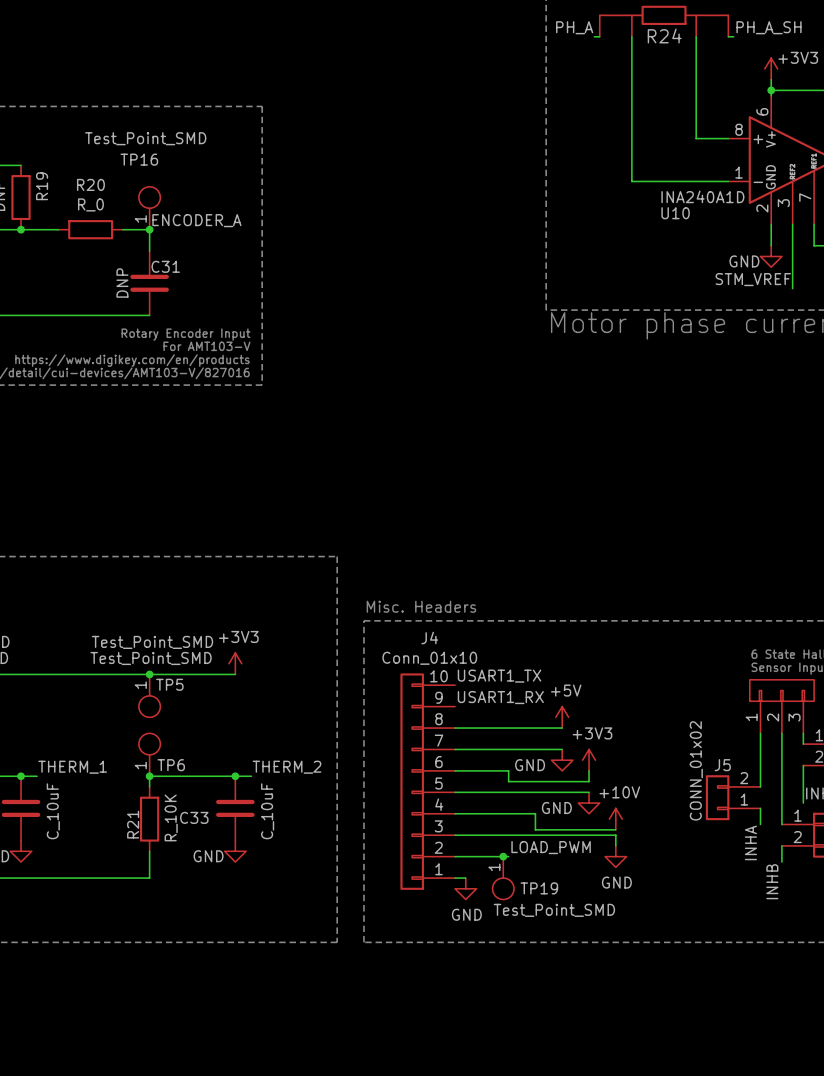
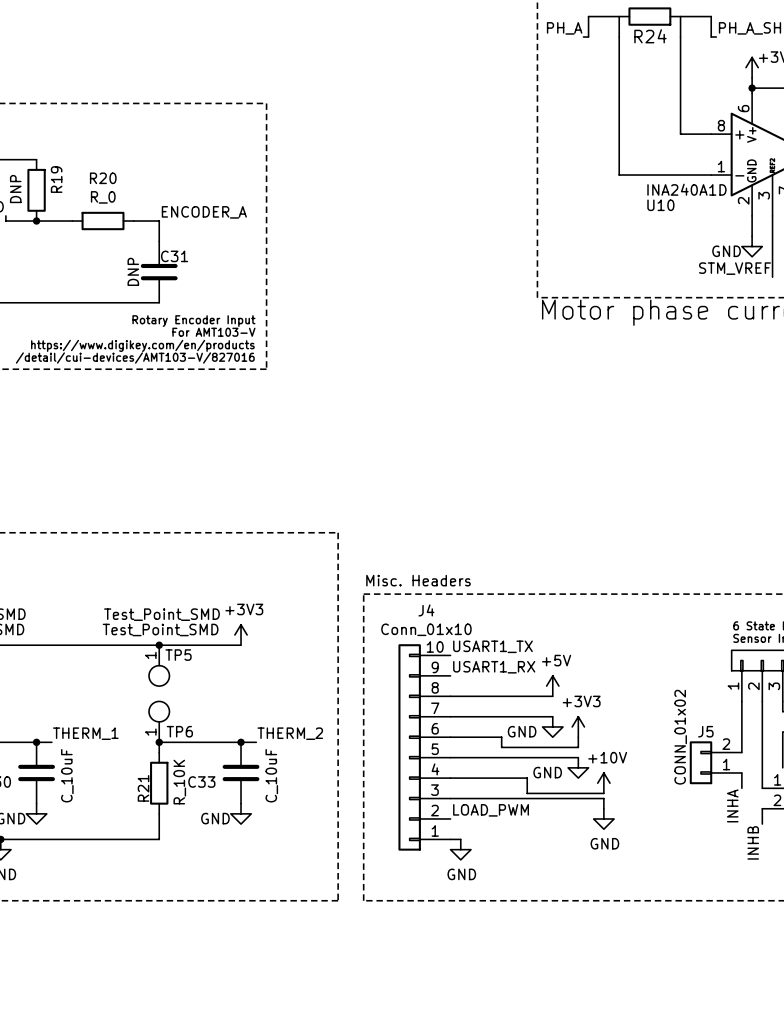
TP16: Test_Point_SMD (149, 208) -> none
junction: (149, 229) -> none
label position: LOAD_PWM (551, 847) -> LOAD_PWM (491, 810)
wire: (455, 856) (508, 856) -> none
junction: (503, 856) -> none
TP19: Test_Point_SMD (503, 878) -> none

